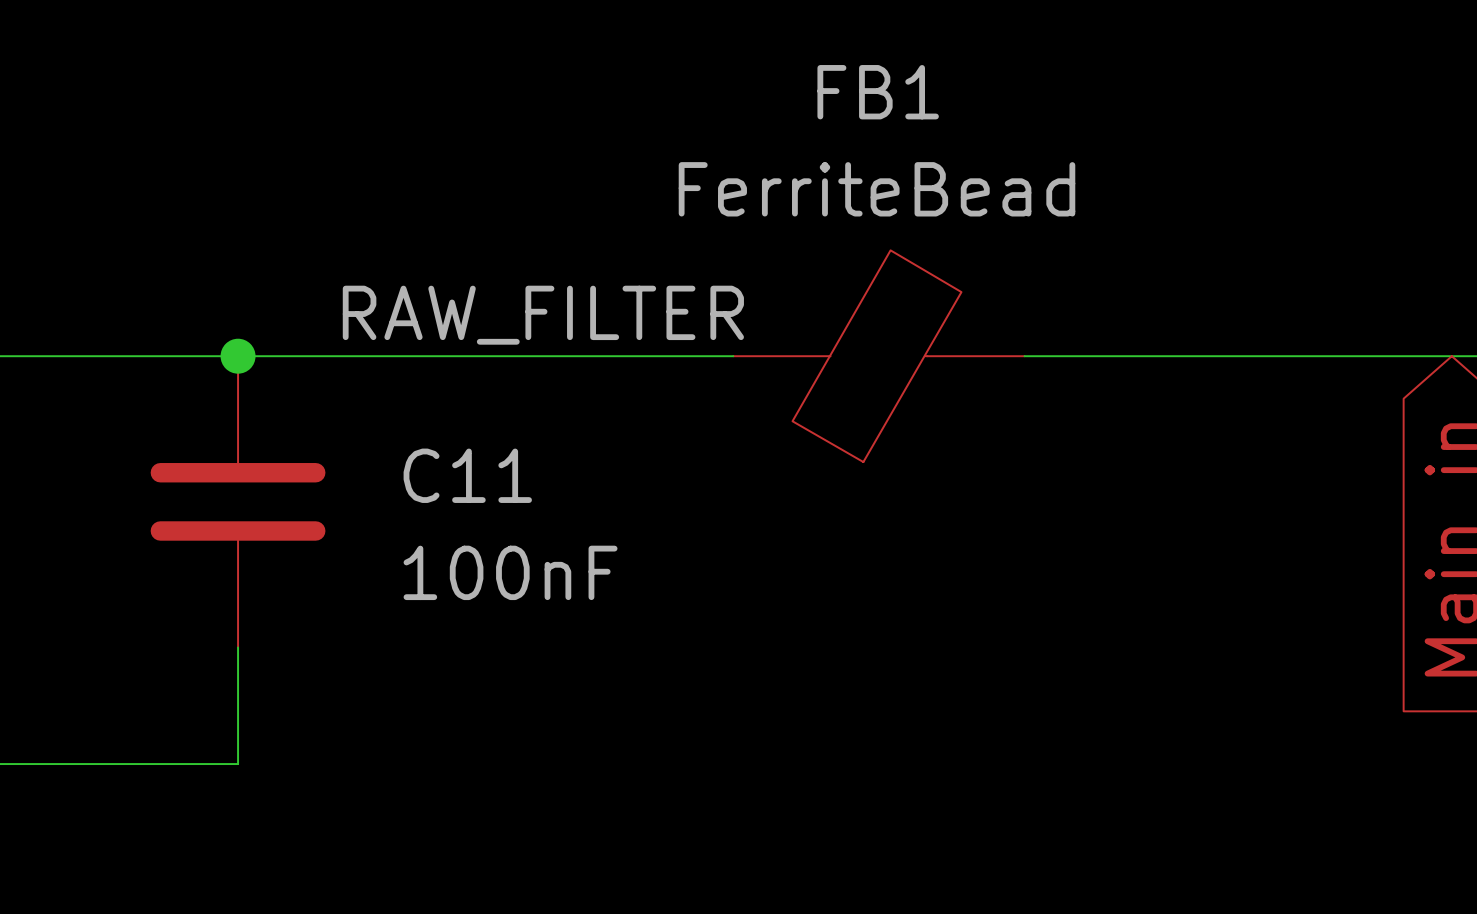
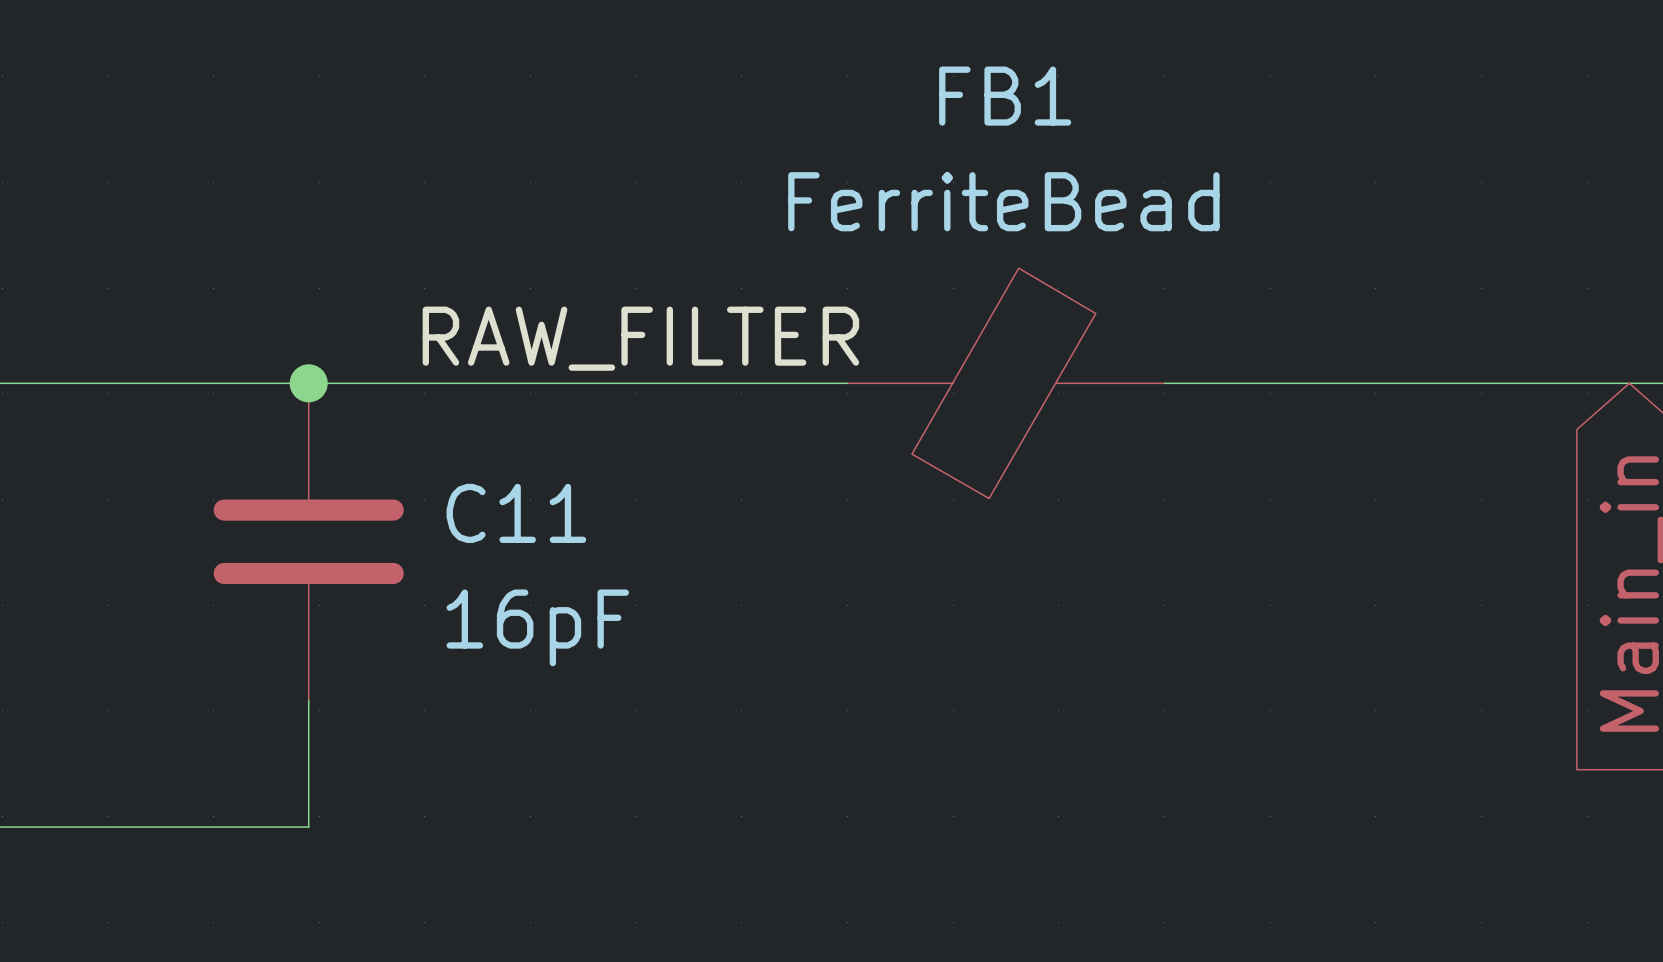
C11 name position: C11 (467, 475) -> C11 (516, 513)
C11 value: 100nF (510, 572) -> 16pF (537, 627)

